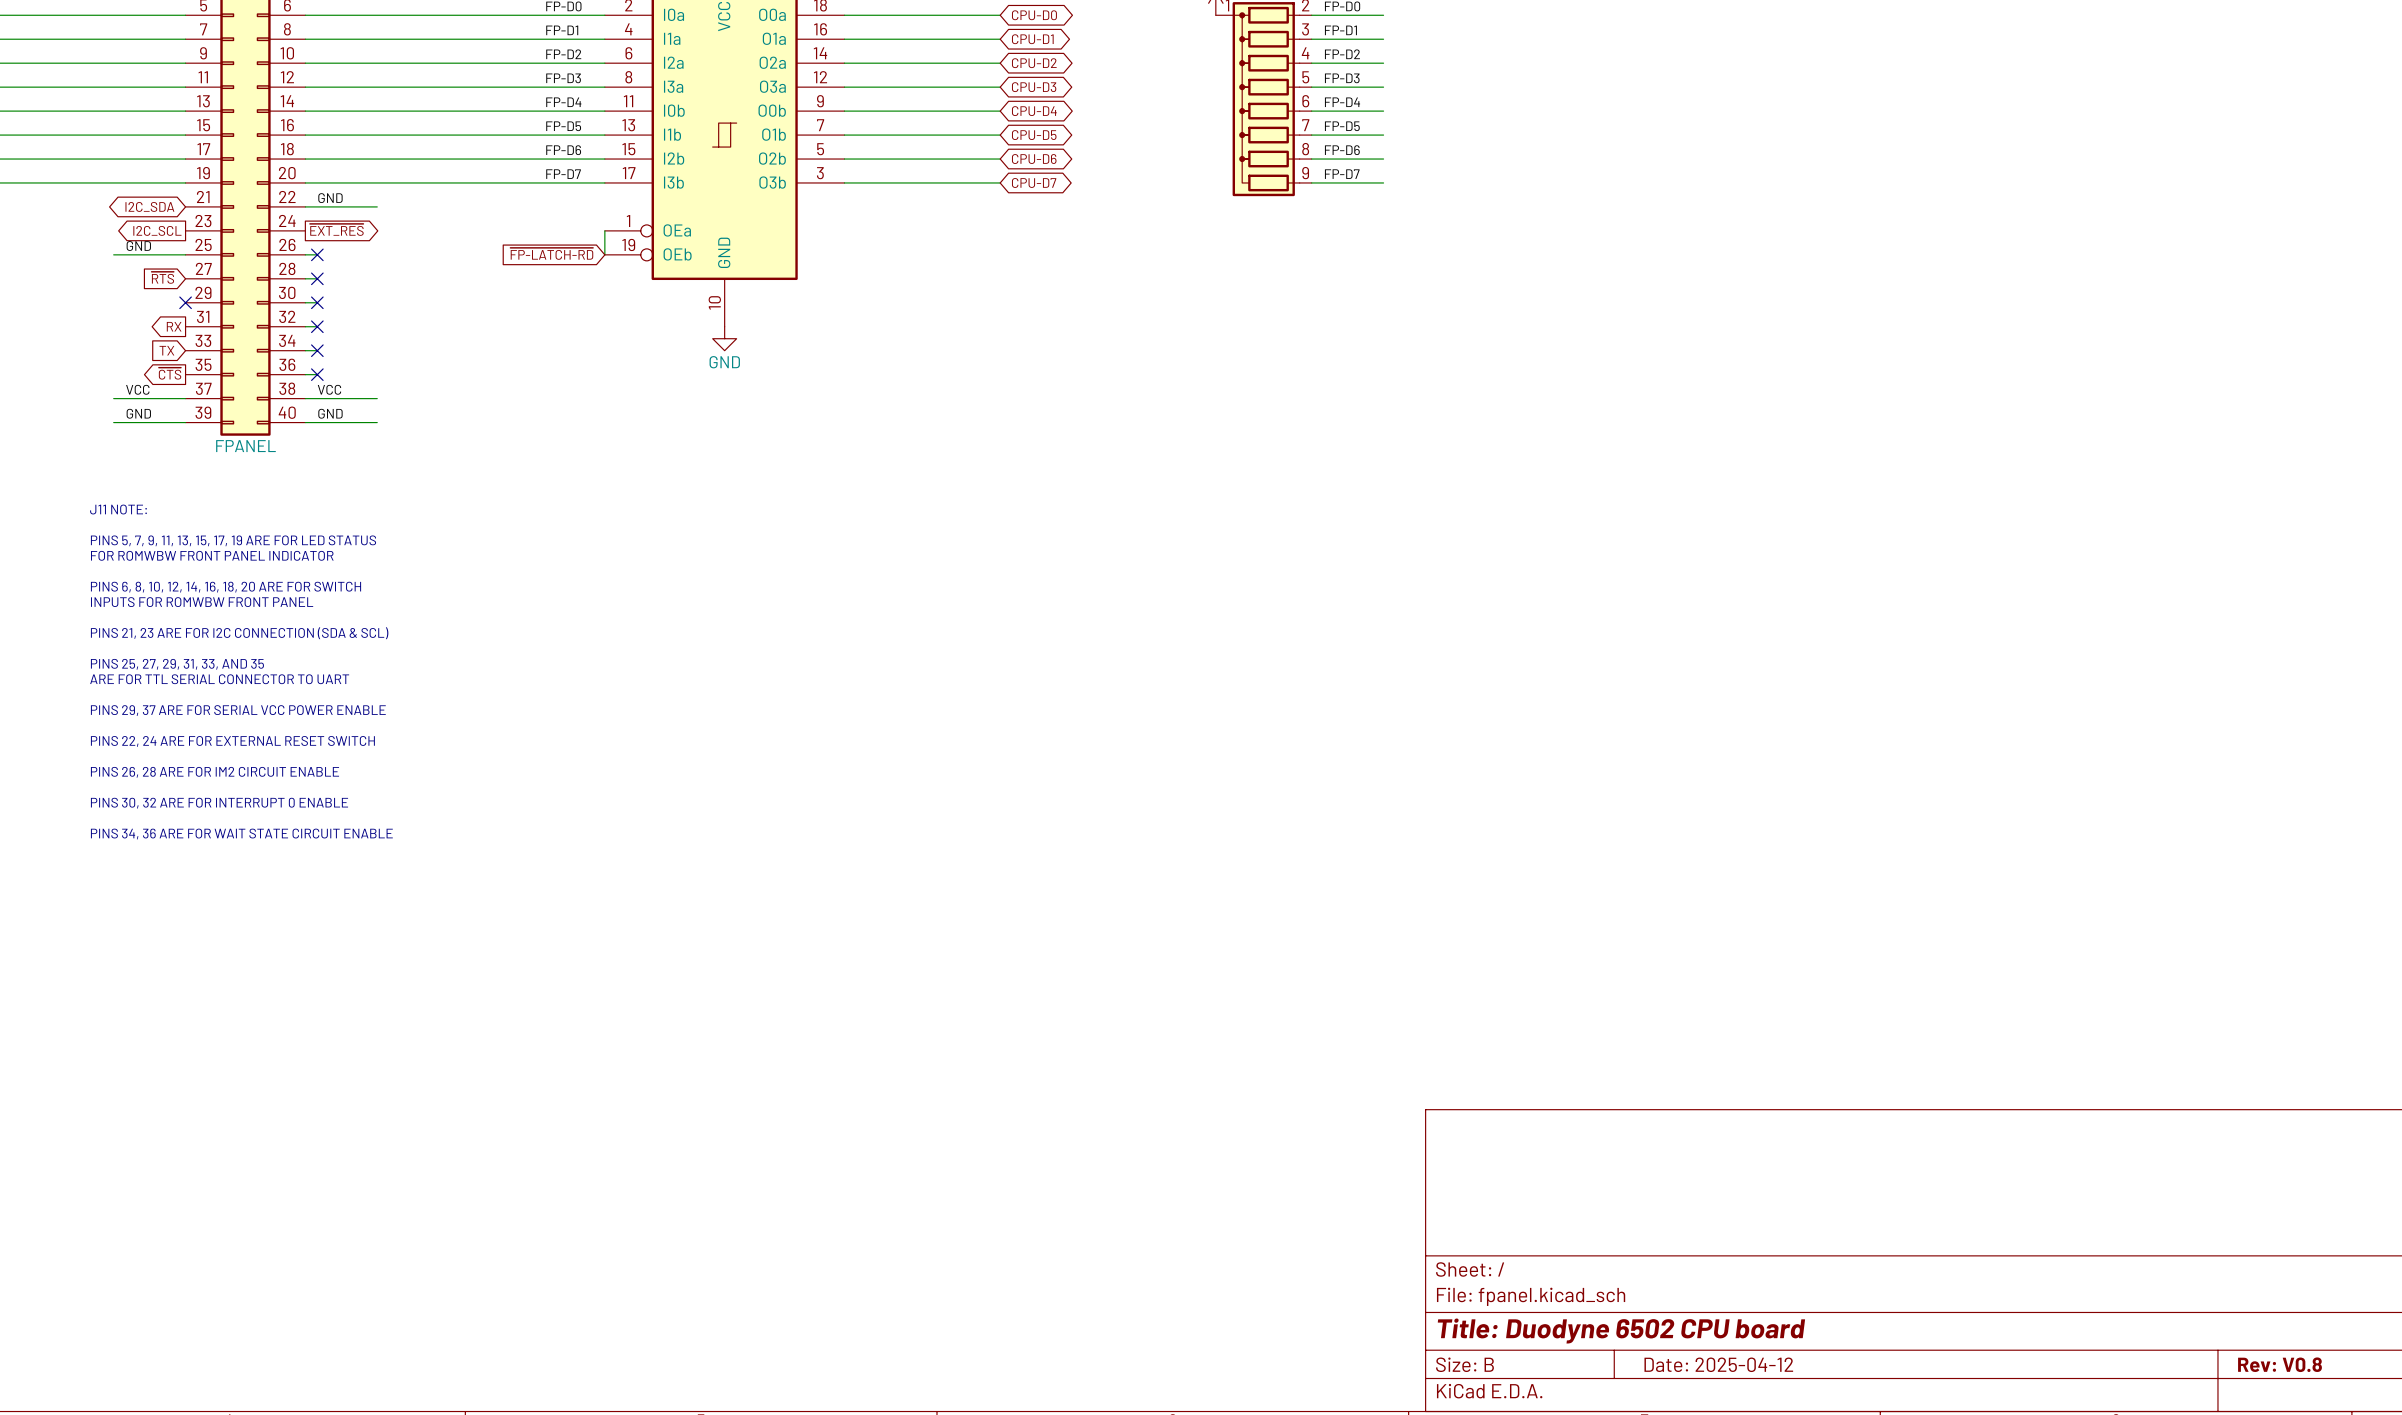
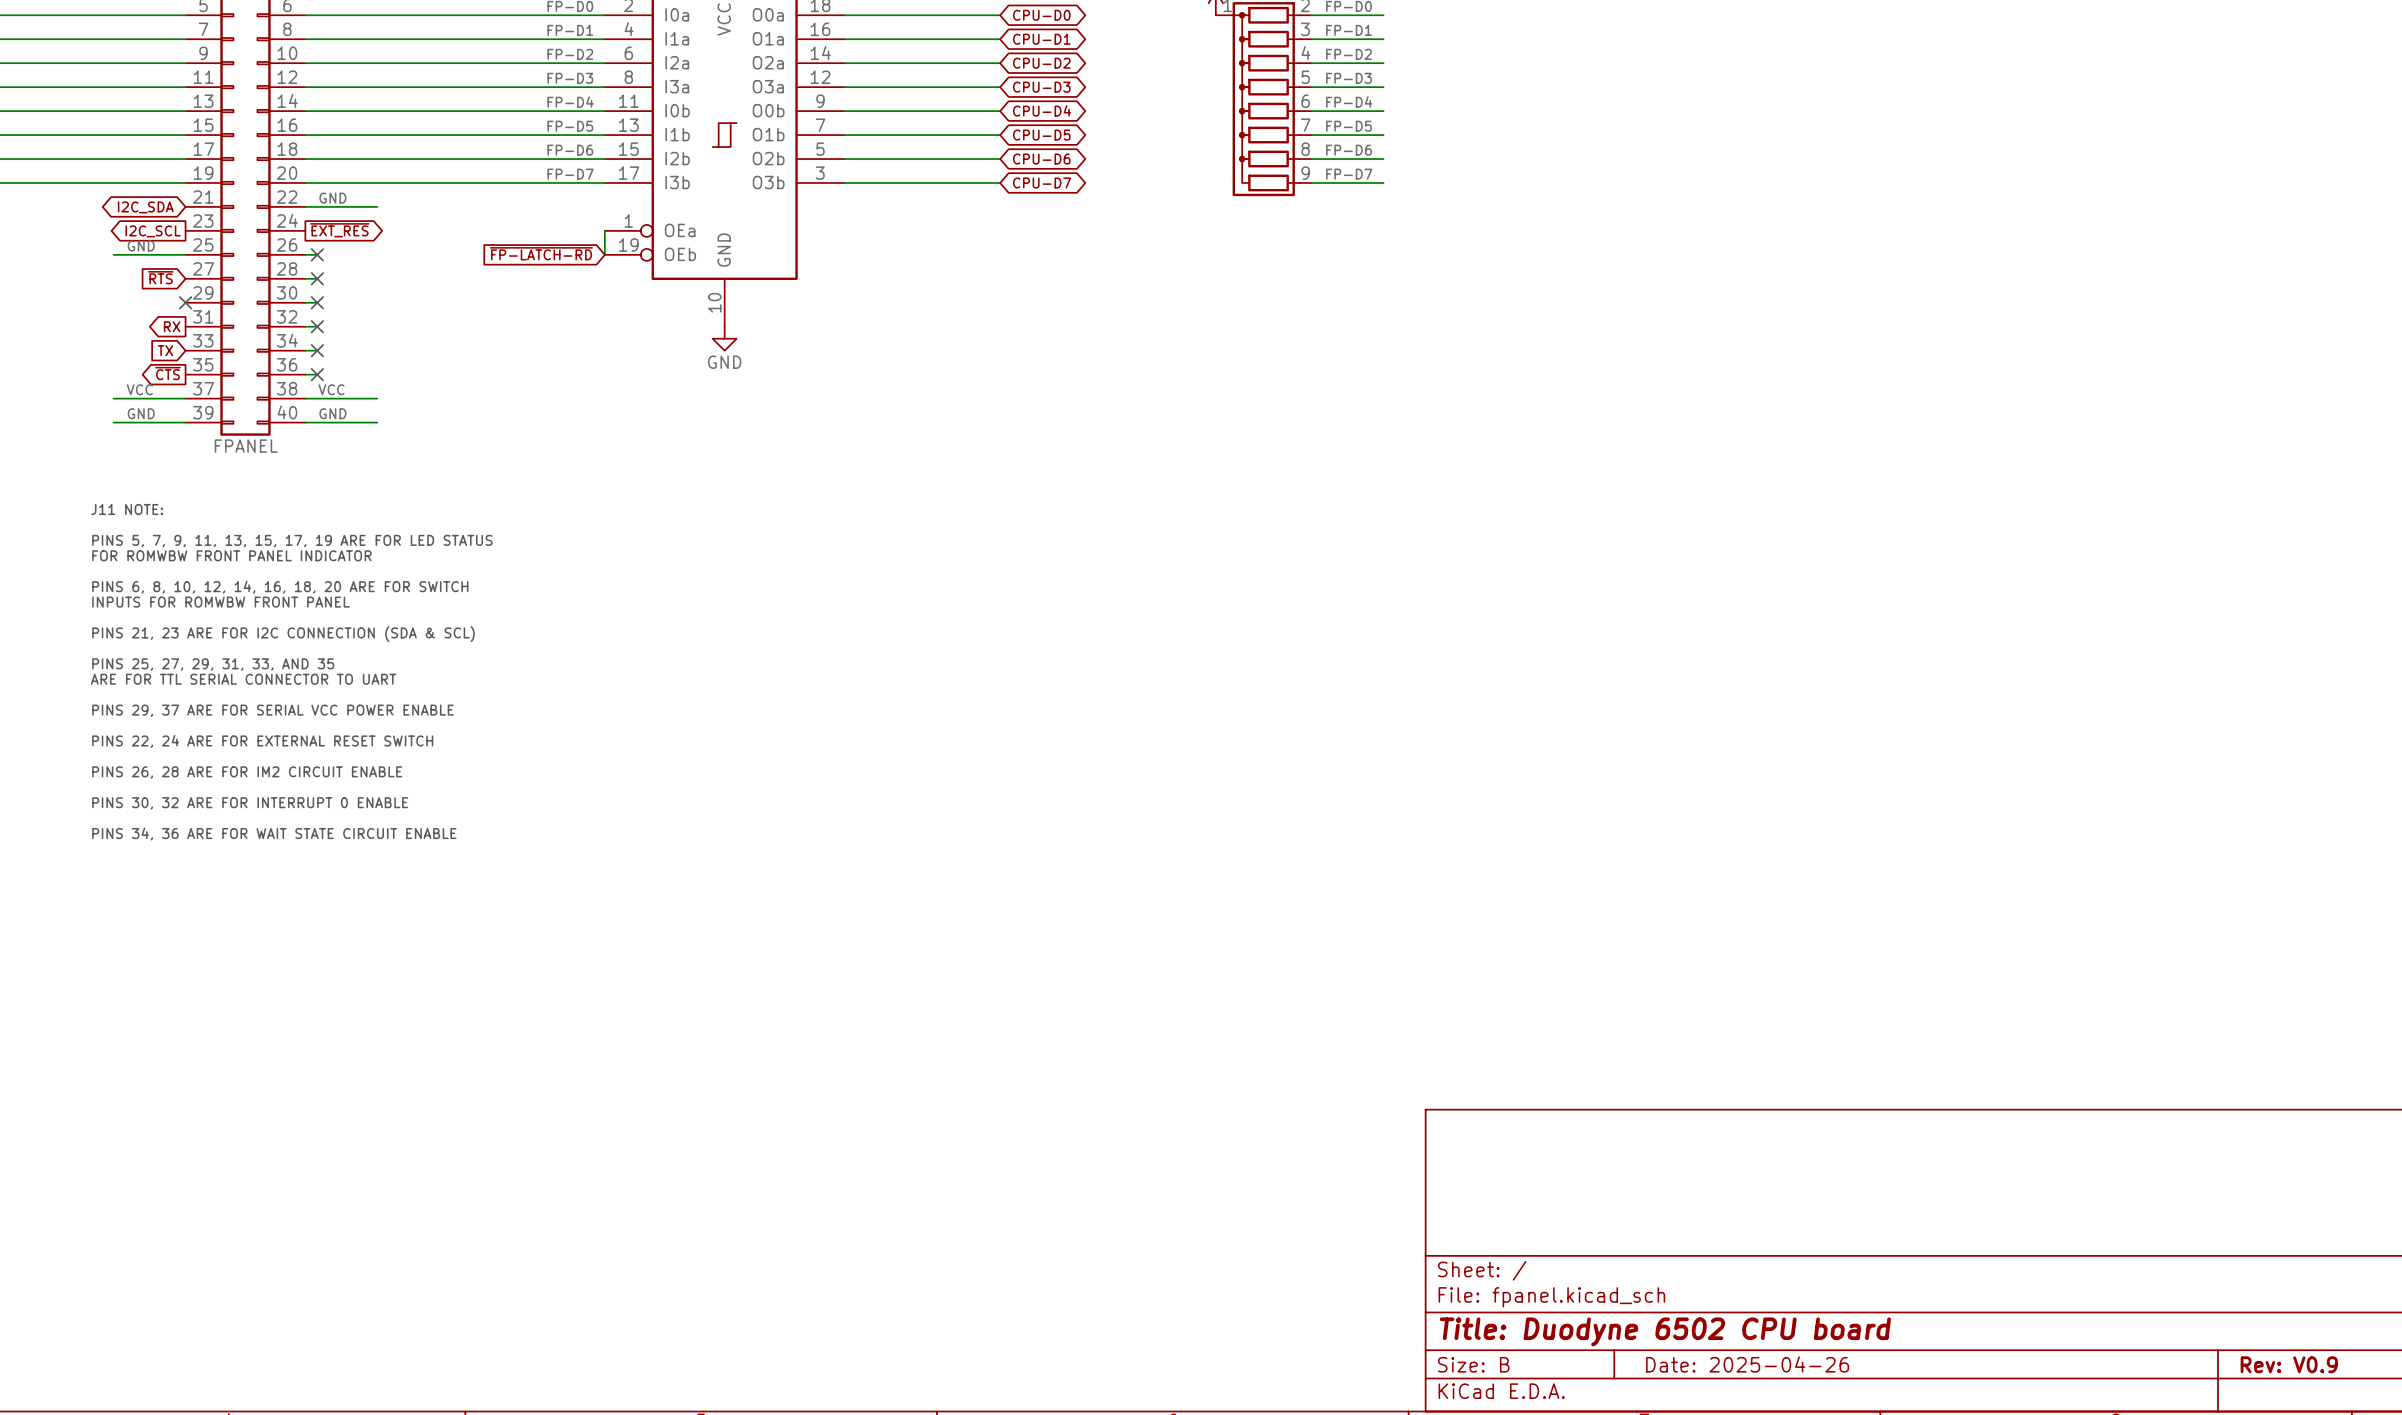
title block: Date: 2025-04-12 (1718, 1364) -> Date: 2025-04-26 (1747, 1364)
title block: Rev: V0.8 (2280, 1364) -> Rev: V0.9 (2289, 1364)

